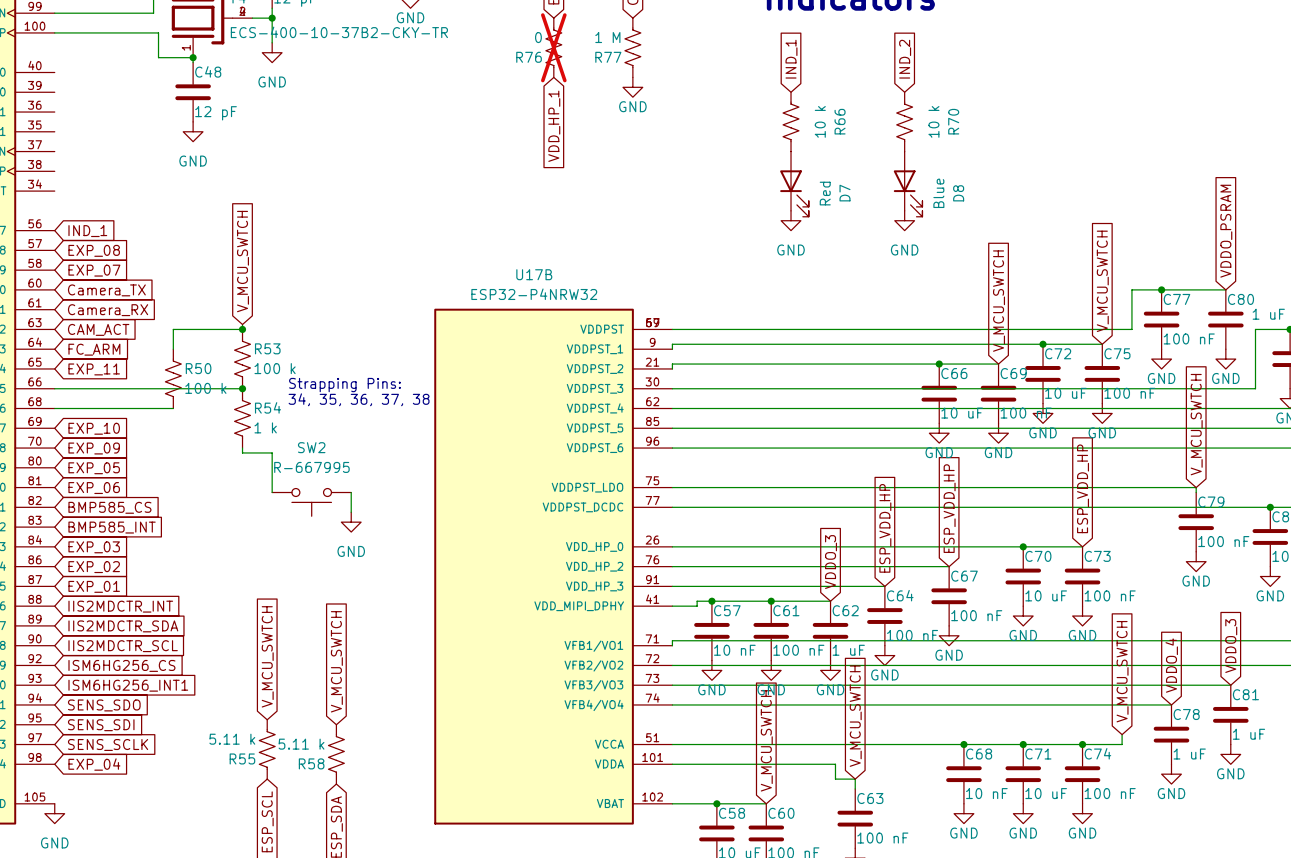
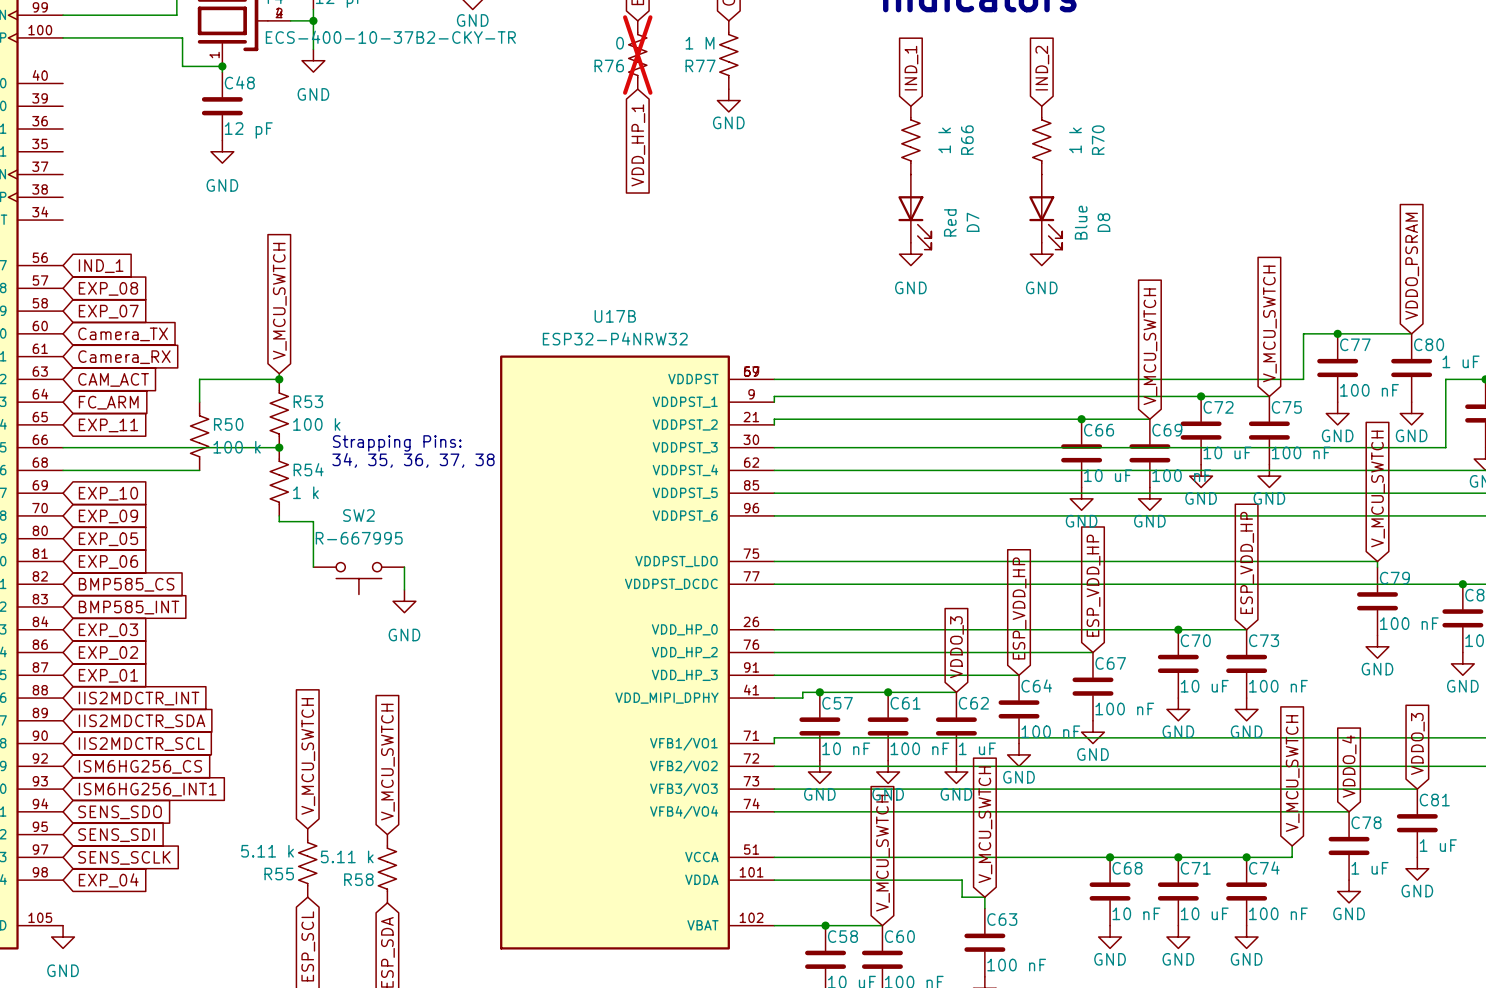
R66 value: 10 k (820, 121) -> 1 k (944, 140)
R70 value: 10 k (933, 121) -> 1 k (1075, 140)

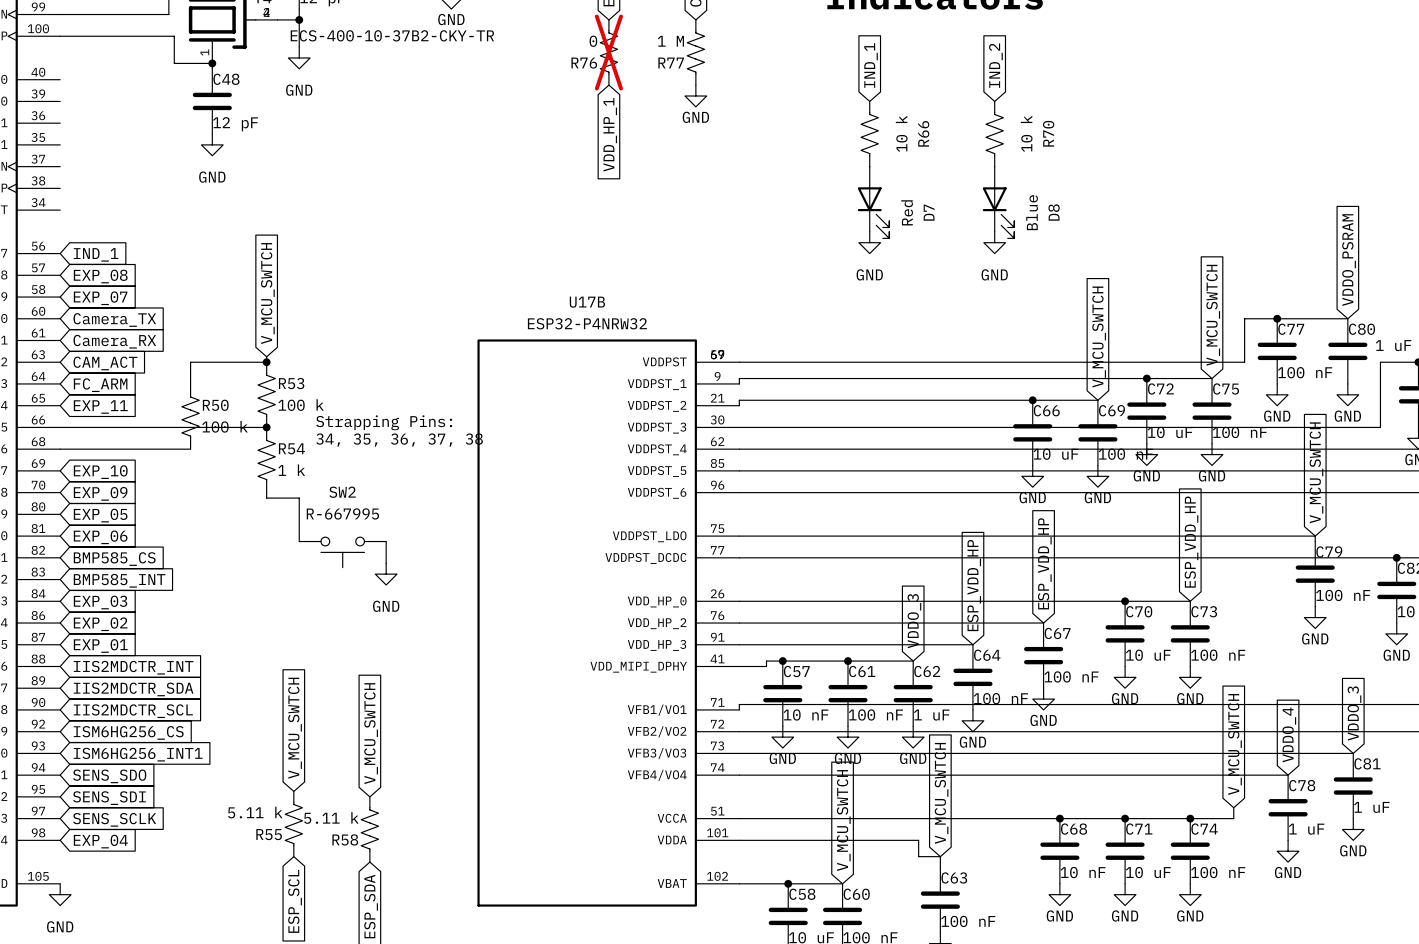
R66 value: 1 k (944, 140) -> 10 k (901, 133)
R70 value: 1 k (1075, 140) -> 10 k (1026, 133)

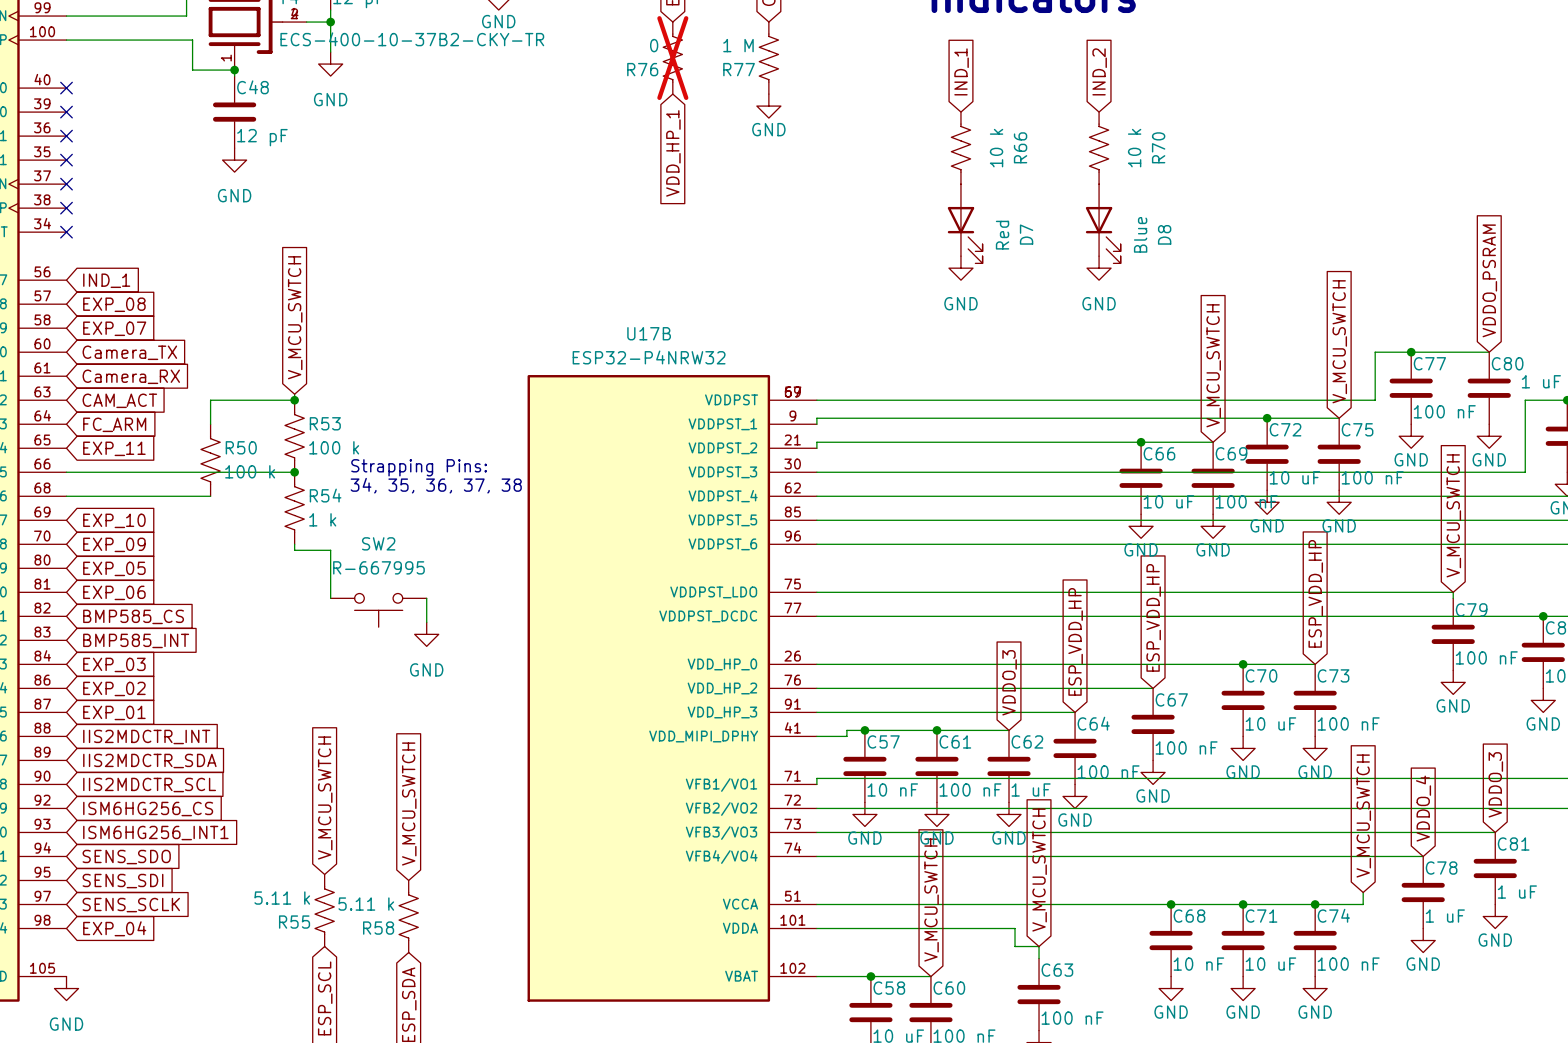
no-connect mark: none -> (66, 88)
no-connect mark: none -> (66, 112)
no-connect mark: none -> (66, 136)
no-connect mark: none -> (66, 160)
no-connect mark: none -> (66, 184)
no-connect mark: none -> (66, 208)
no-connect mark: none -> (66, 232)

